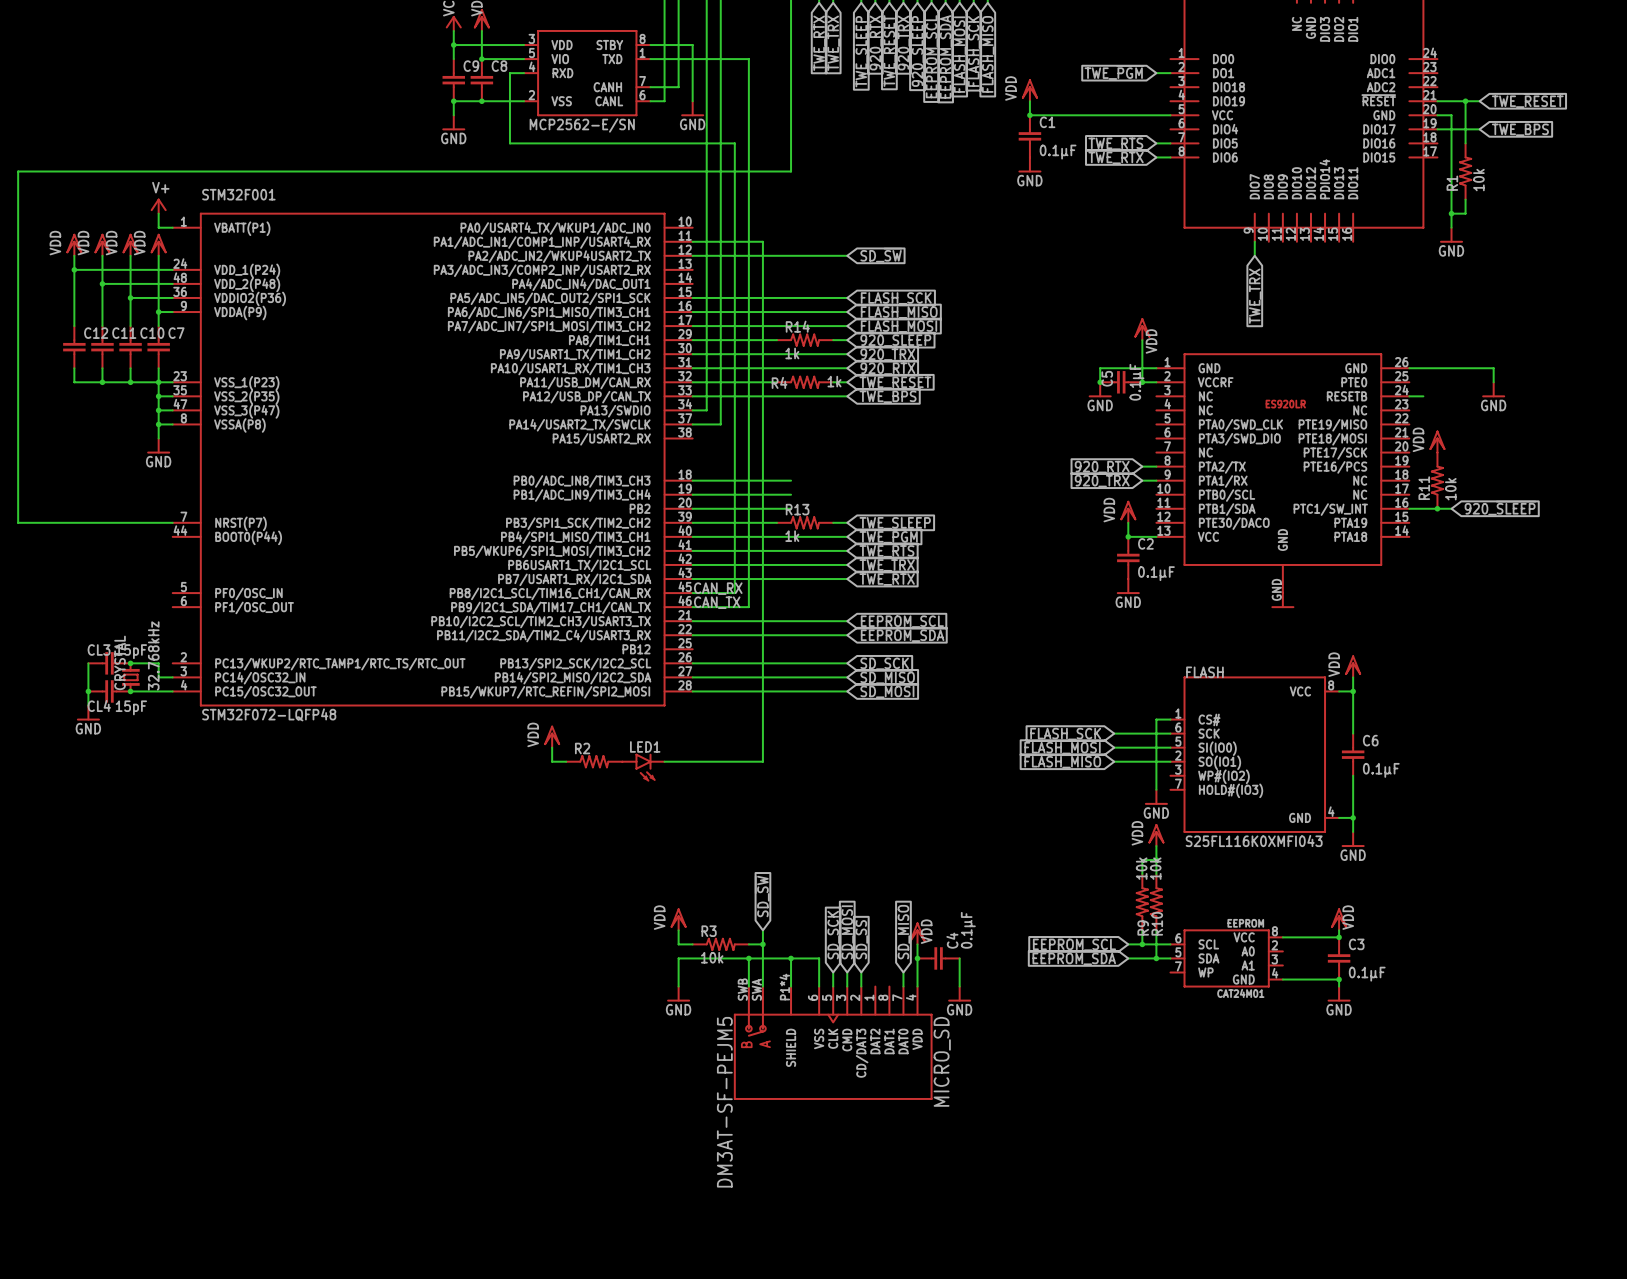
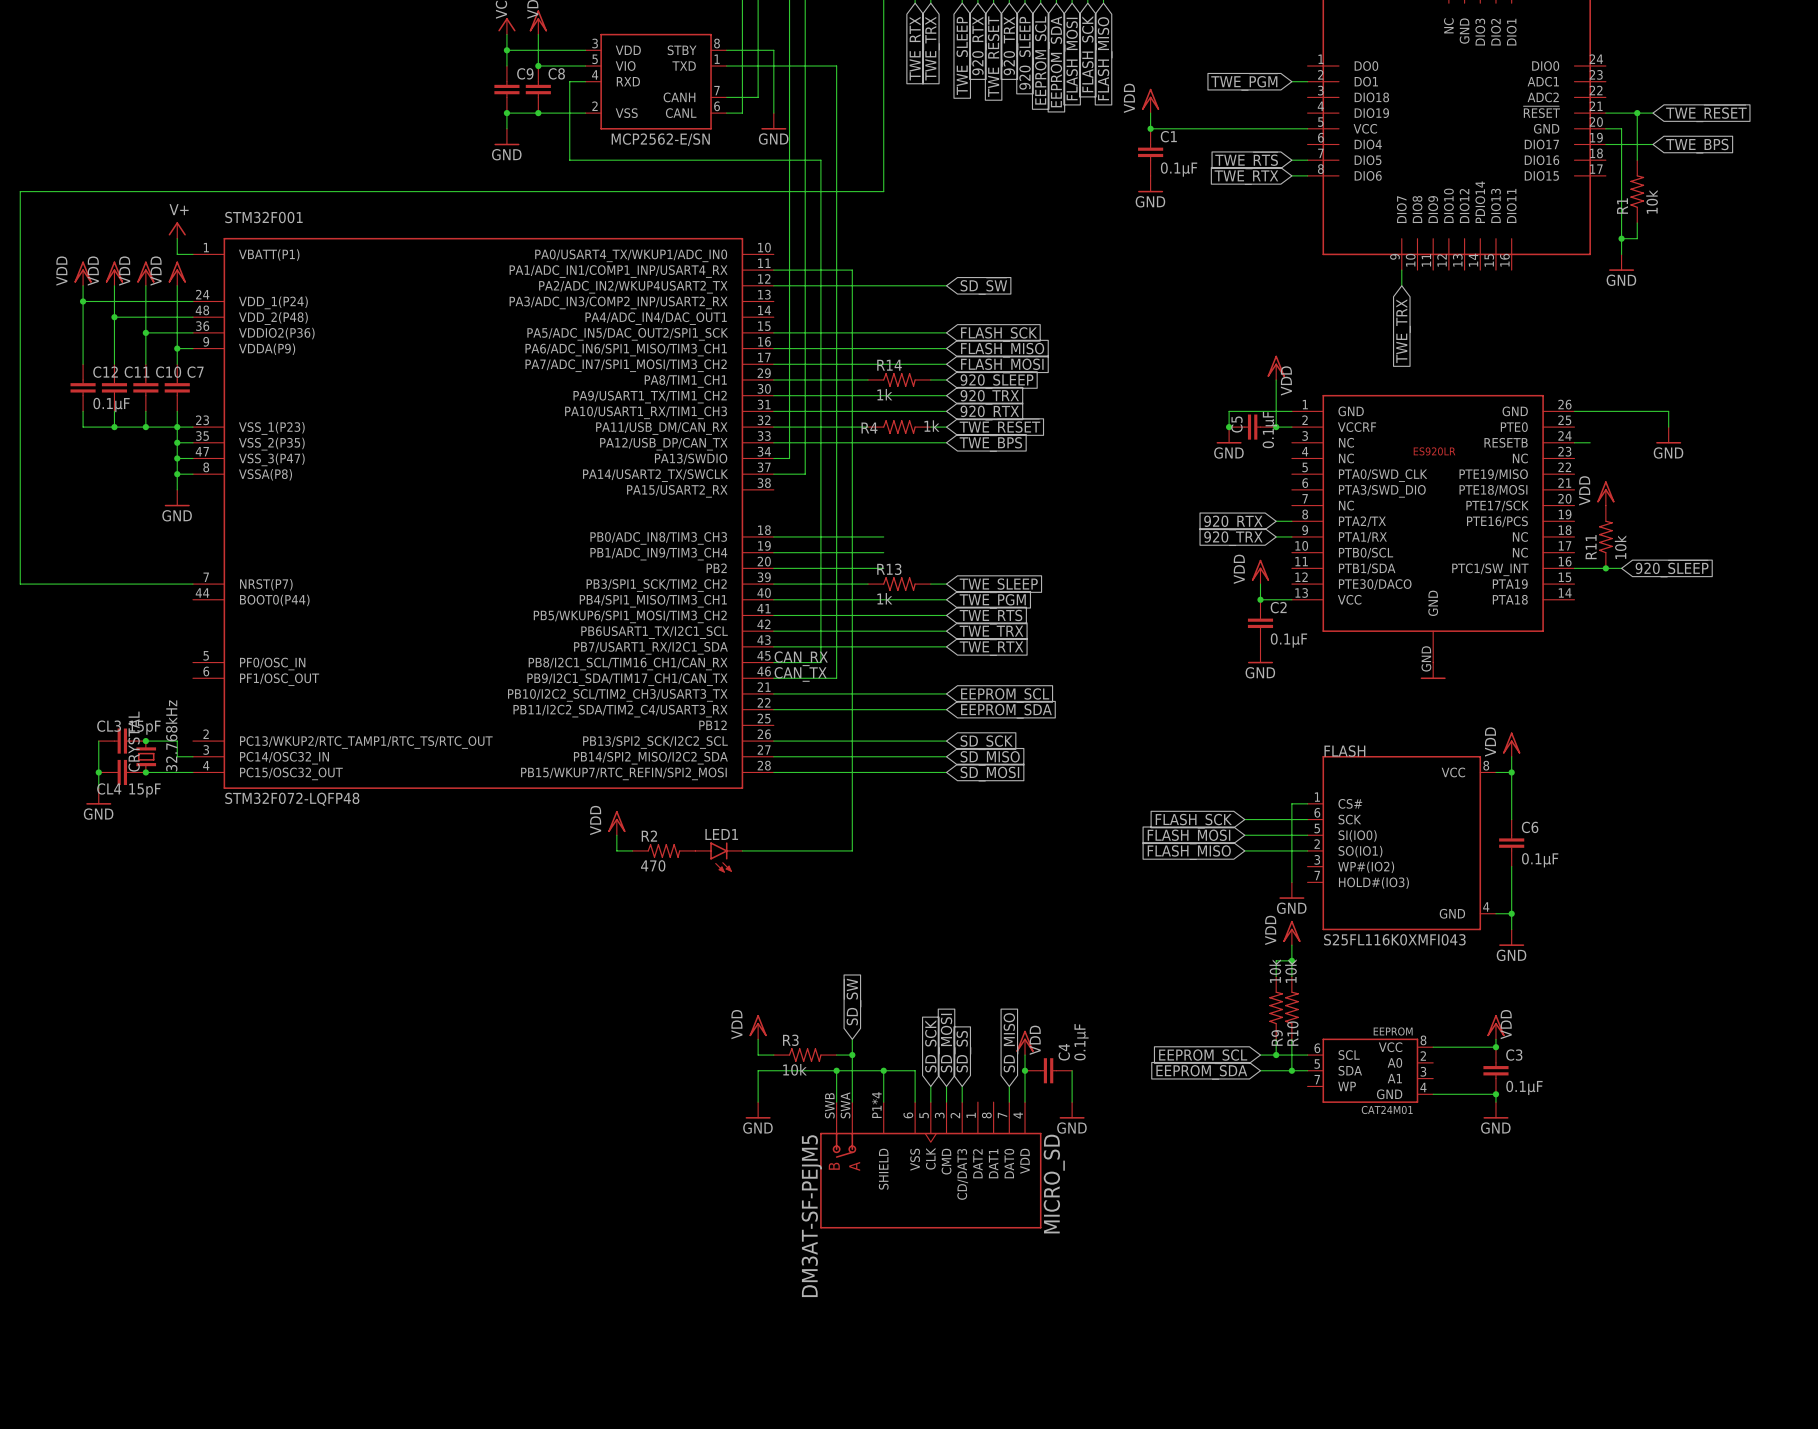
C12 value: none -> 0.1µF (111, 405)
R2 value: none -> 470 (653, 865)

